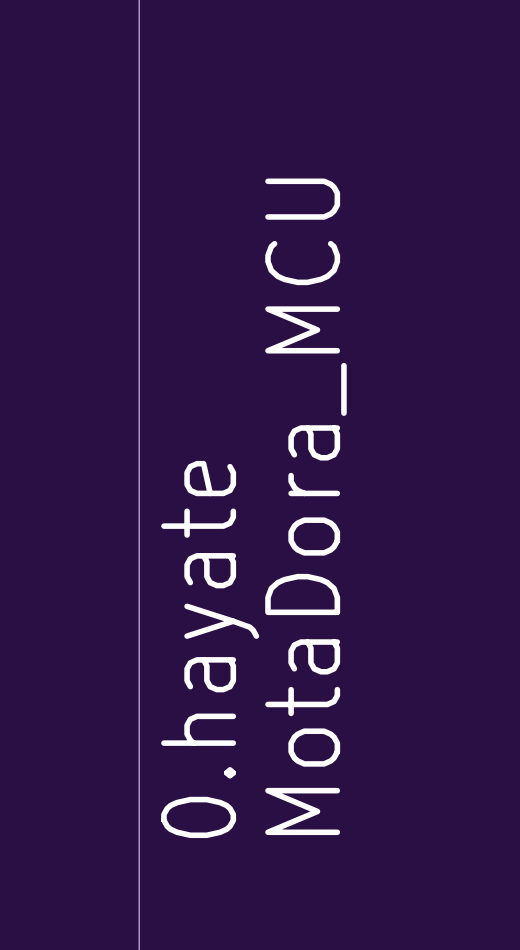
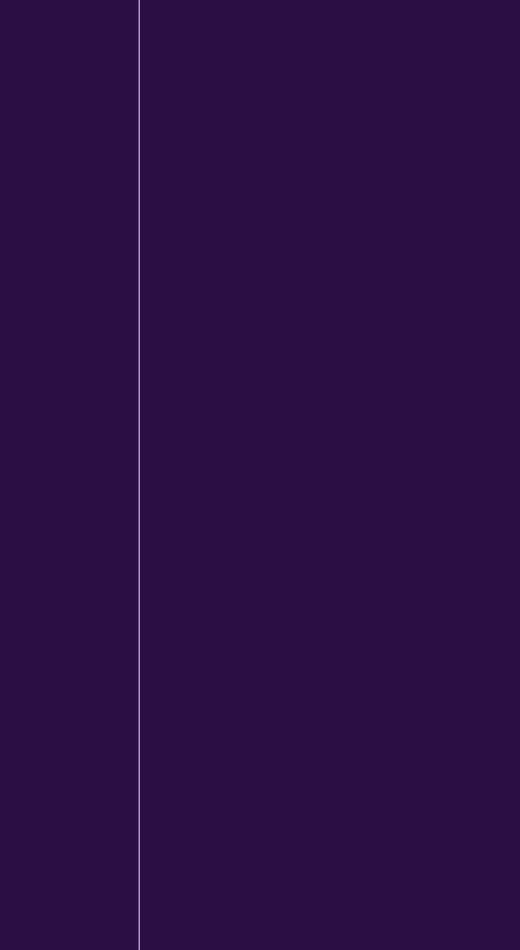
text: MotaDora_MCU (305, 506) -> none
text: 0.hayate (210, 649) -> none

